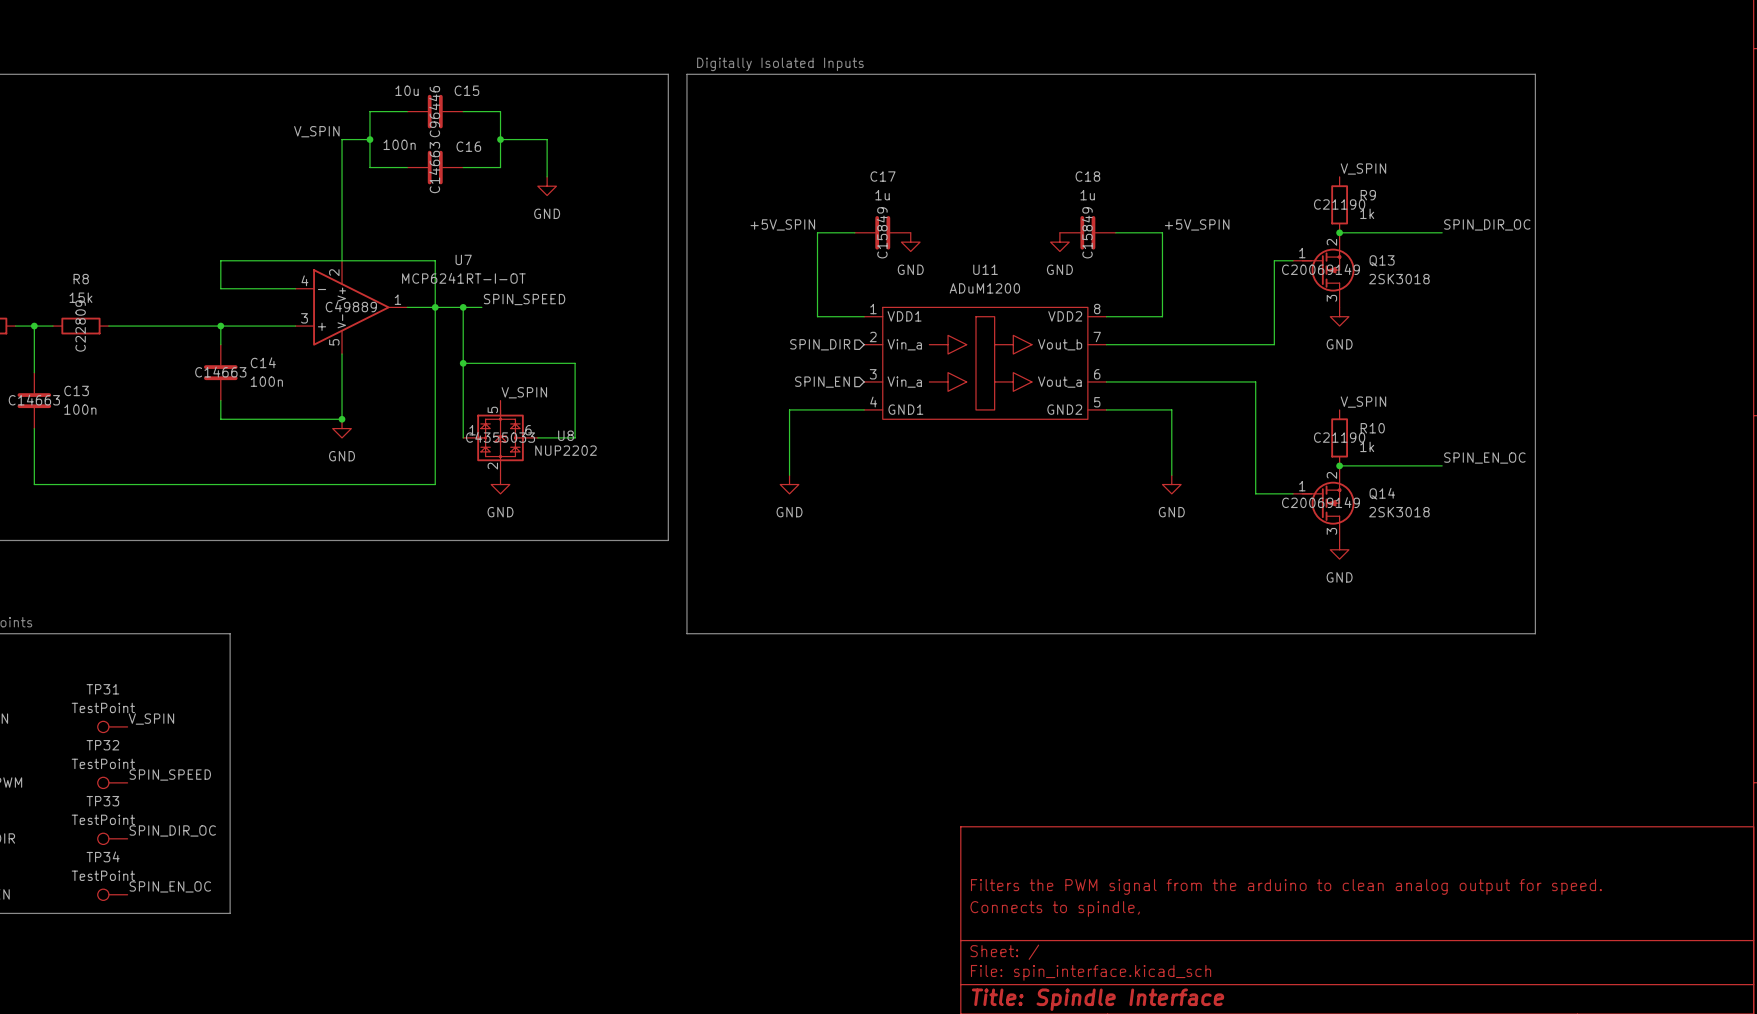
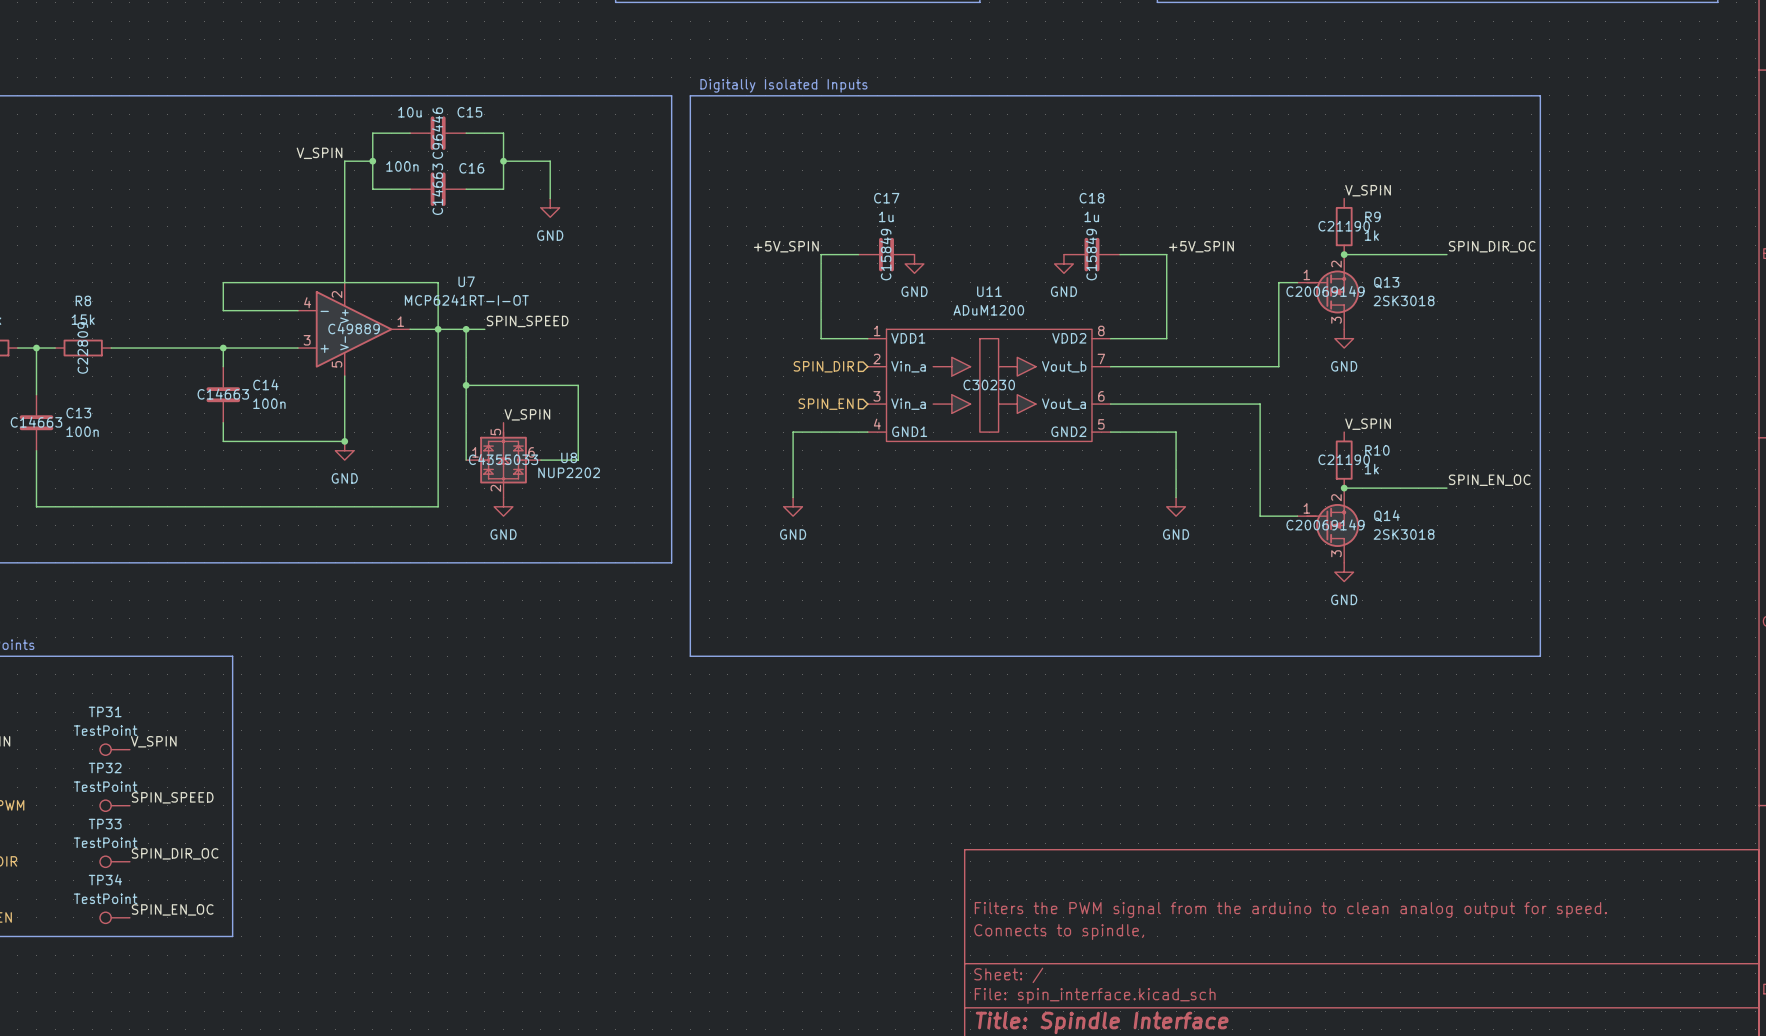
U11 text: none -> C30230 (989, 385)

